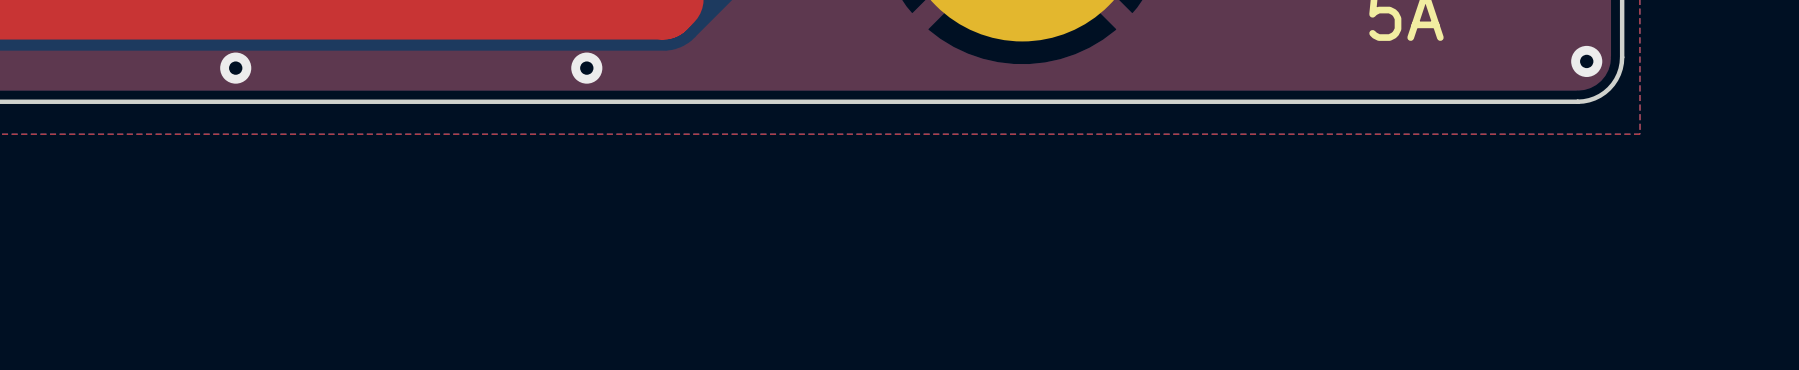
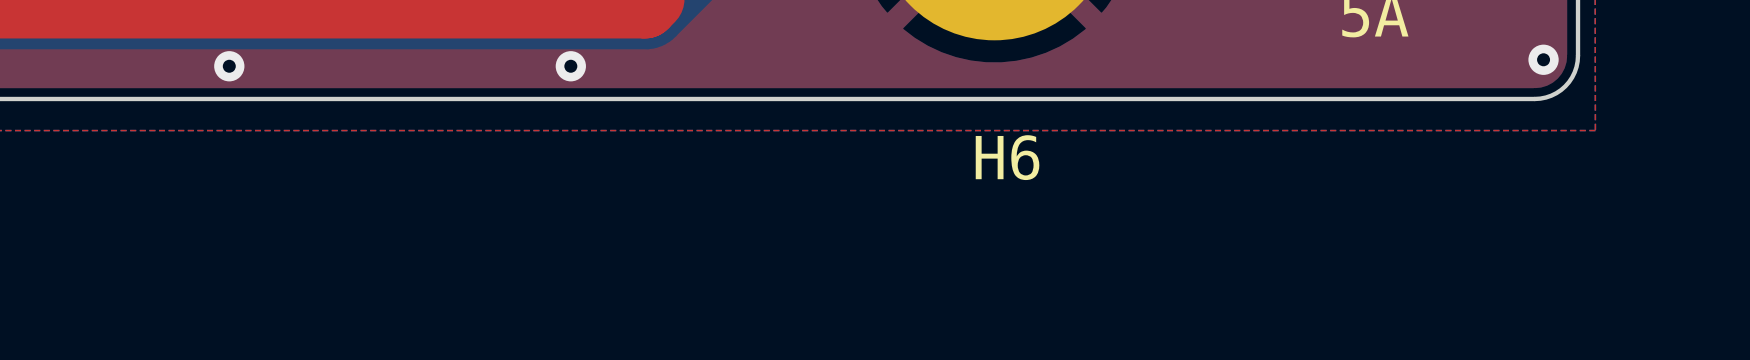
H6 name: none -> H6 (1007, 157)

